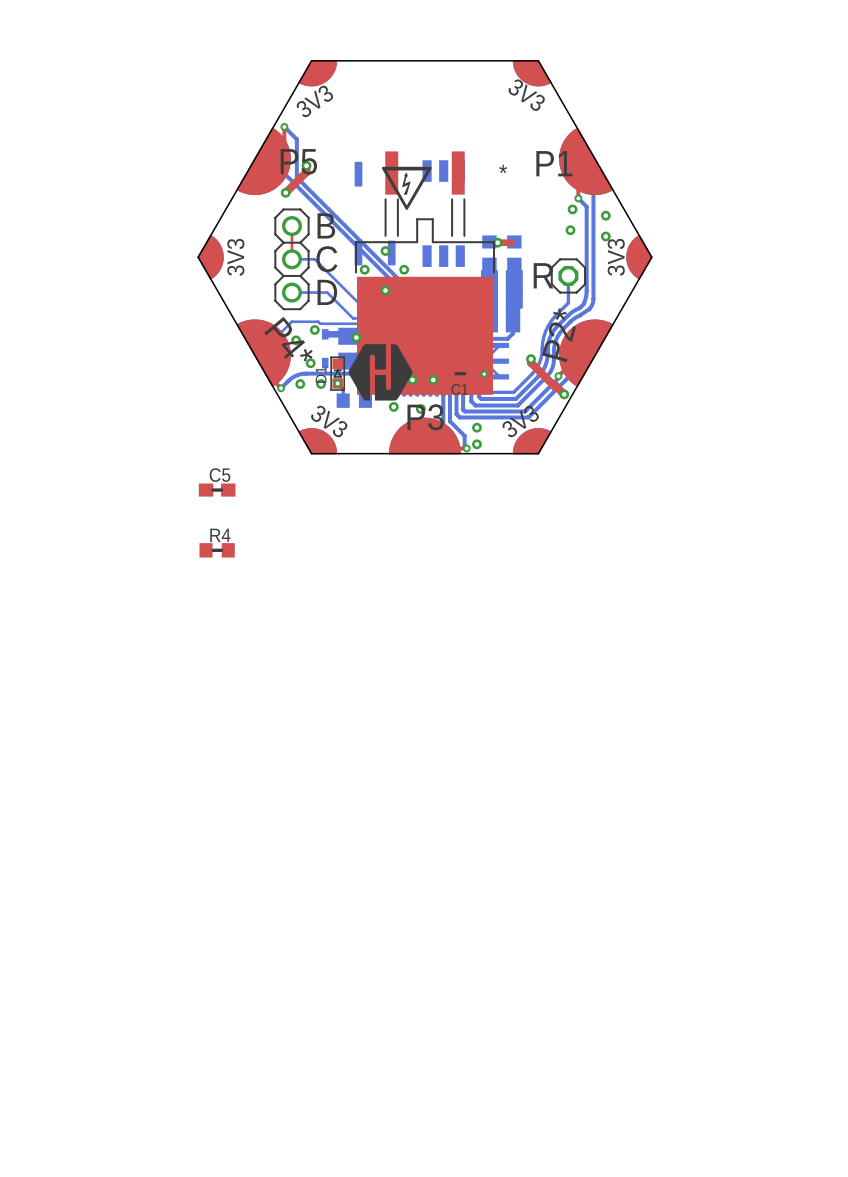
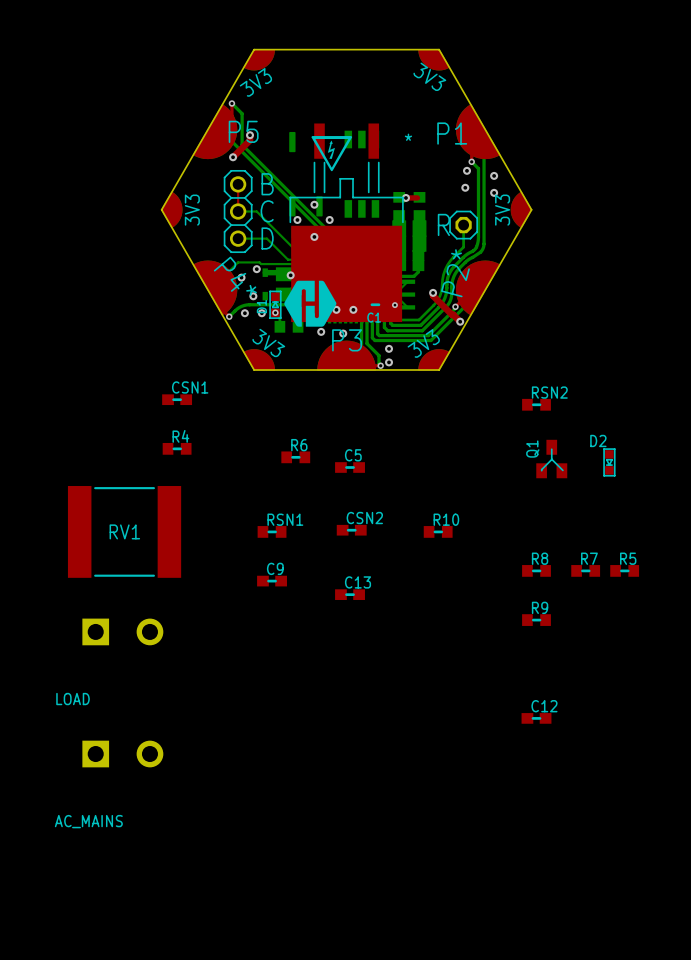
C5 name: C5 (220, 475) -> CSN1 (190, 387)
RSN2: none -> (536, 404)
R6: none -> (295, 457)
Q1: none -> (551, 459)
D2: none -> (609, 462)
C5: none -> (350, 467)
CSN2: none -> (351, 530)
RV1: none -> (124, 531)
RSN1: none -> (272, 531)
R10: none -> (438, 531)
R8: none -> (536, 570)
R7: none -> (585, 570)
R5: none -> (624, 570)
C9: none -> (272, 581)
C13: none -> (350, 594)
R9: none -> (536, 620)
LOAD: none -> (122, 631)
C12: none -> (536, 718)
AC_MAINS: none -> (122, 754)

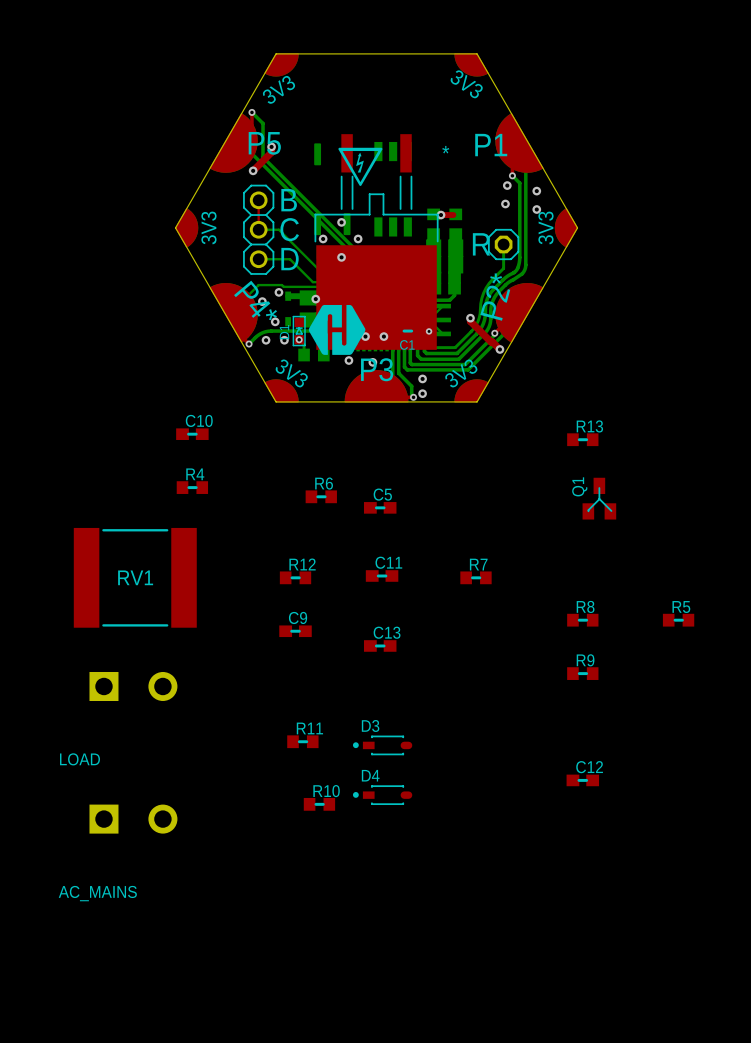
CSN1 name: CSN1 (190, 387) -> C10 (199, 420)
RSN2 name: RSN2 (549, 392) -> R13 (589, 426)
D2: (609, 462) -> none
CSN2 name: CSN2 (364, 518) -> C11 (388, 562)
RSN1 name: RSN1 (285, 519) -> R12 (302, 564)
R10 name: R10 (446, 519) -> R7 (478, 564)
R7: (585, 570) -> none
R11: none -> (302, 741)
D3: none -> (382, 745)
D4: none -> (382, 795)
R10: none -> (319, 804)

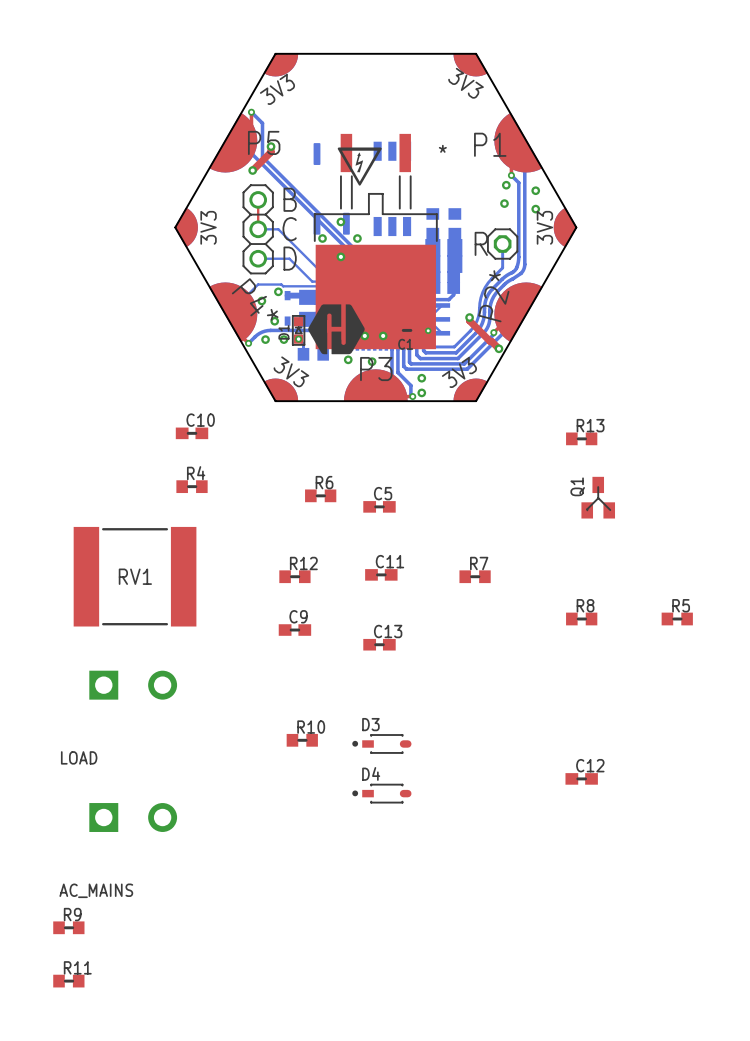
top track: (441, 215) (453, 215) -> none
via: (441, 215) -> none
via: (315, 299) -> none
R9 position: (582, 673) -> (68, 927)
R11 name: R11 (309, 728) -> R10 (311, 727)
R10: (319, 804) -> none
R11: none -> (68, 981)

